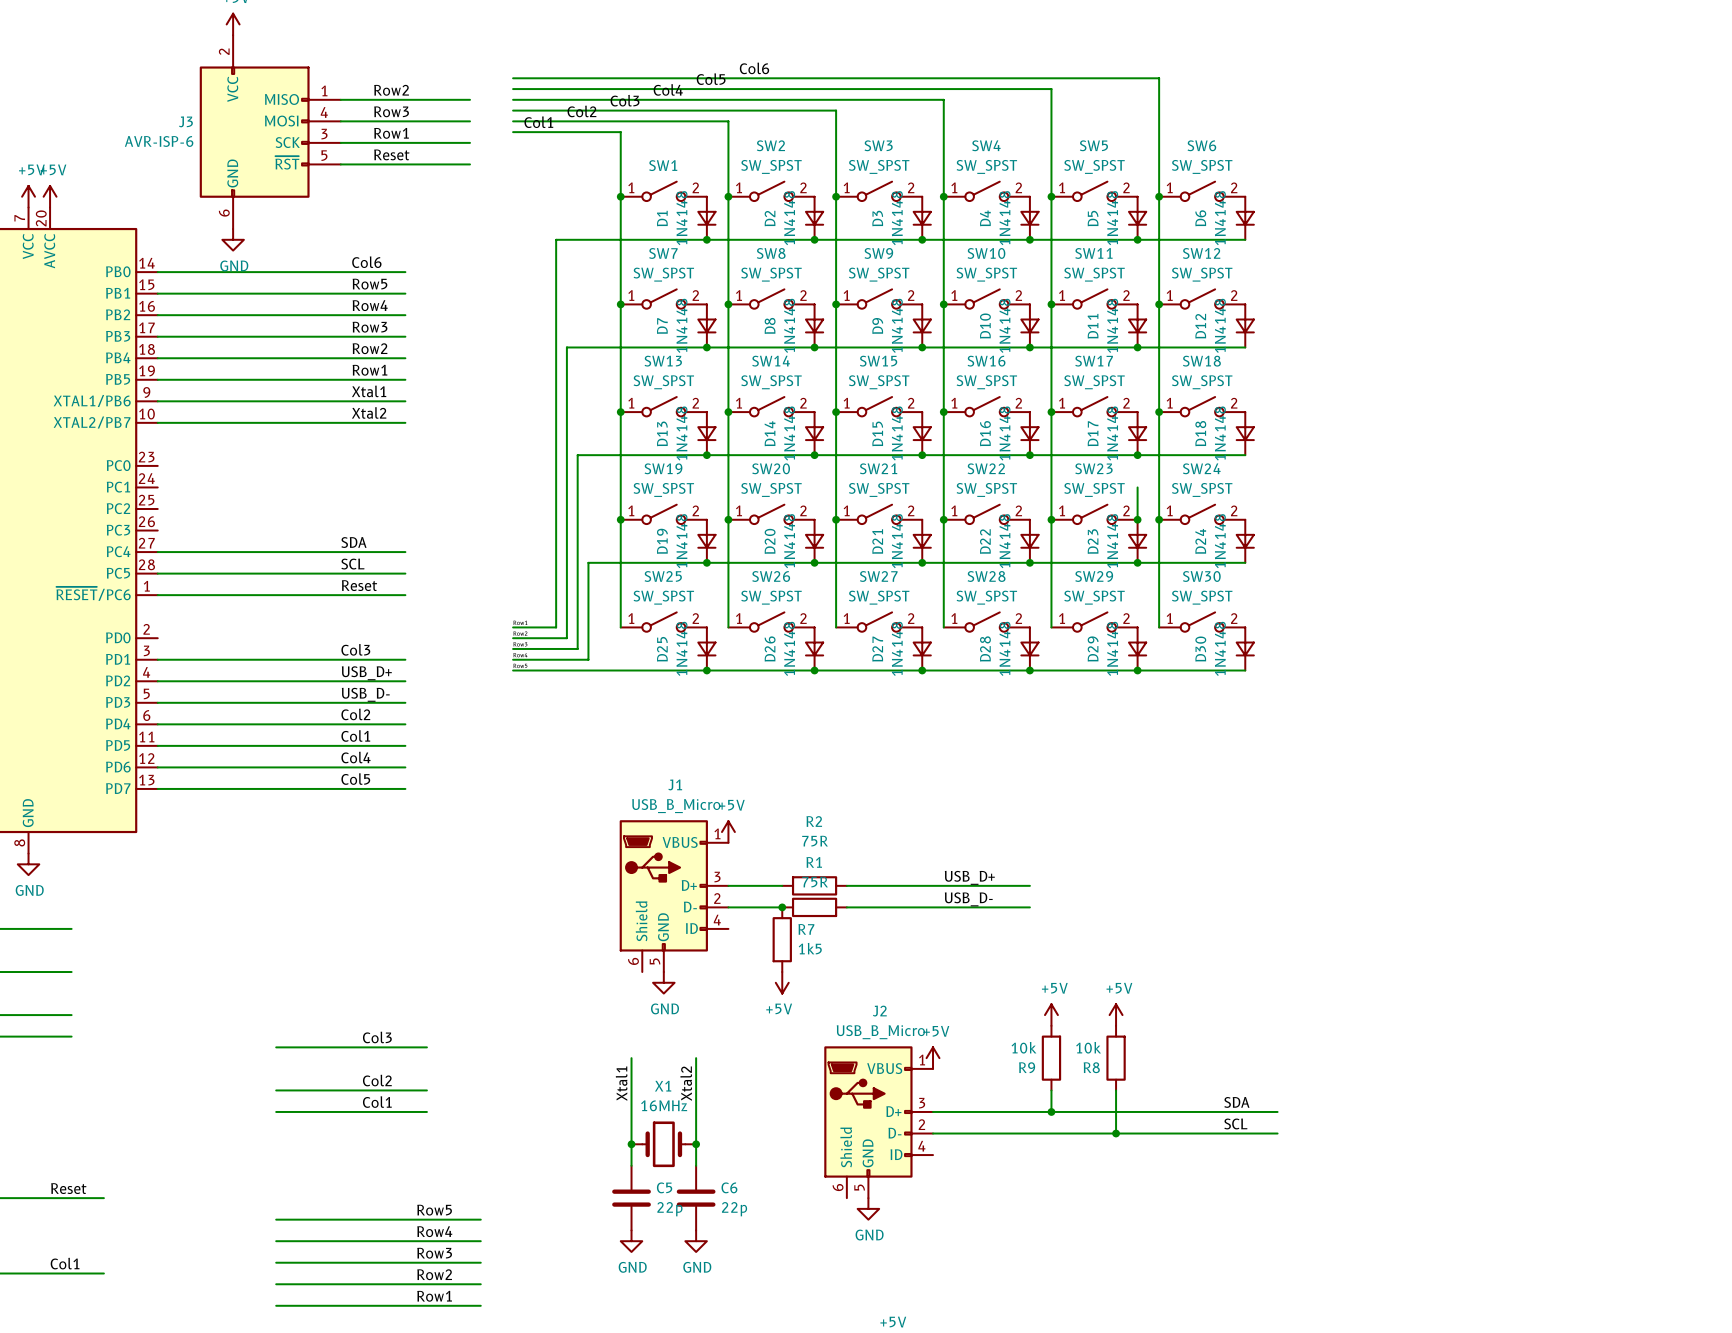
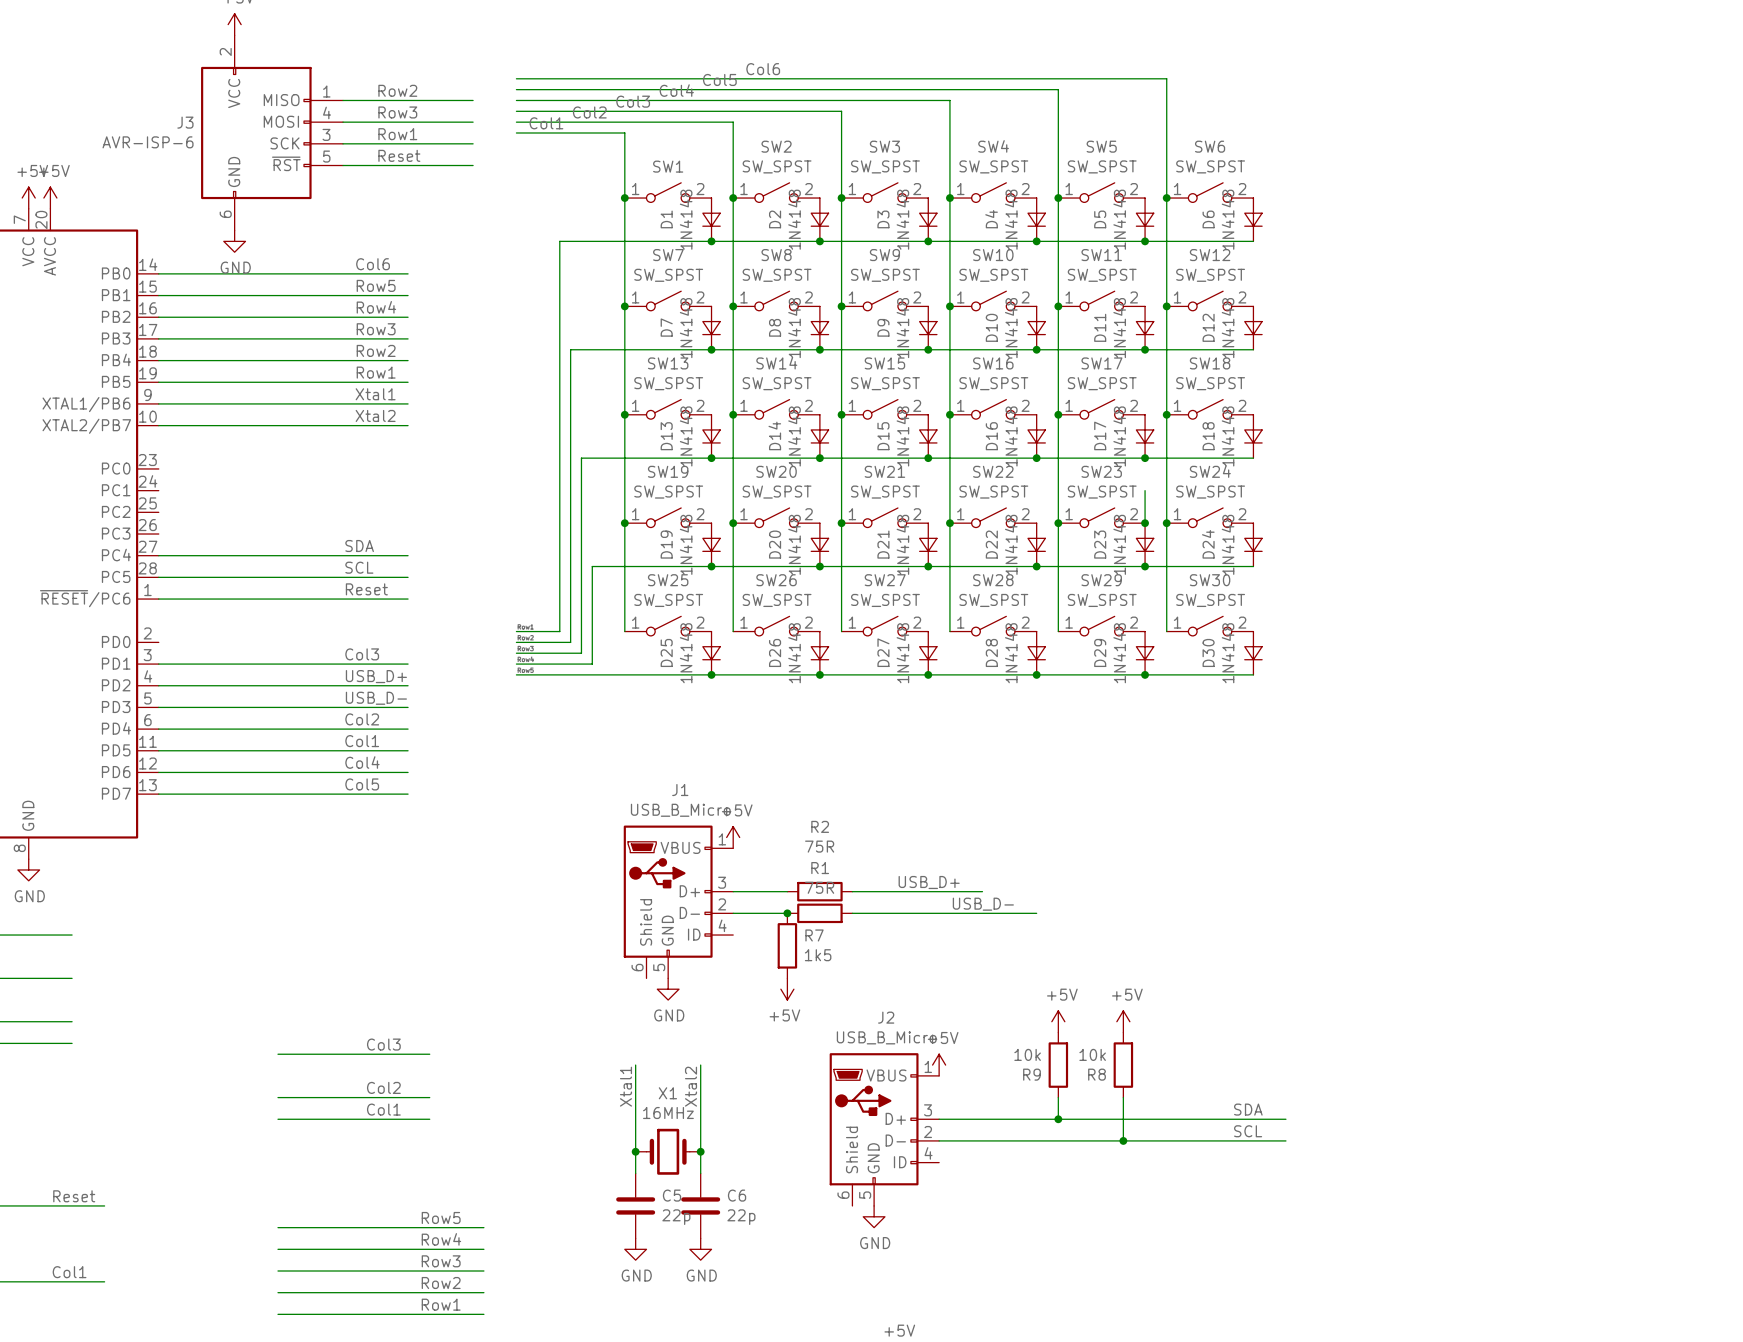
label position: USB_D+ (969, 877) -> USB_D+ (929, 882)
wire: (976, 885) (1029, 885) -> none

